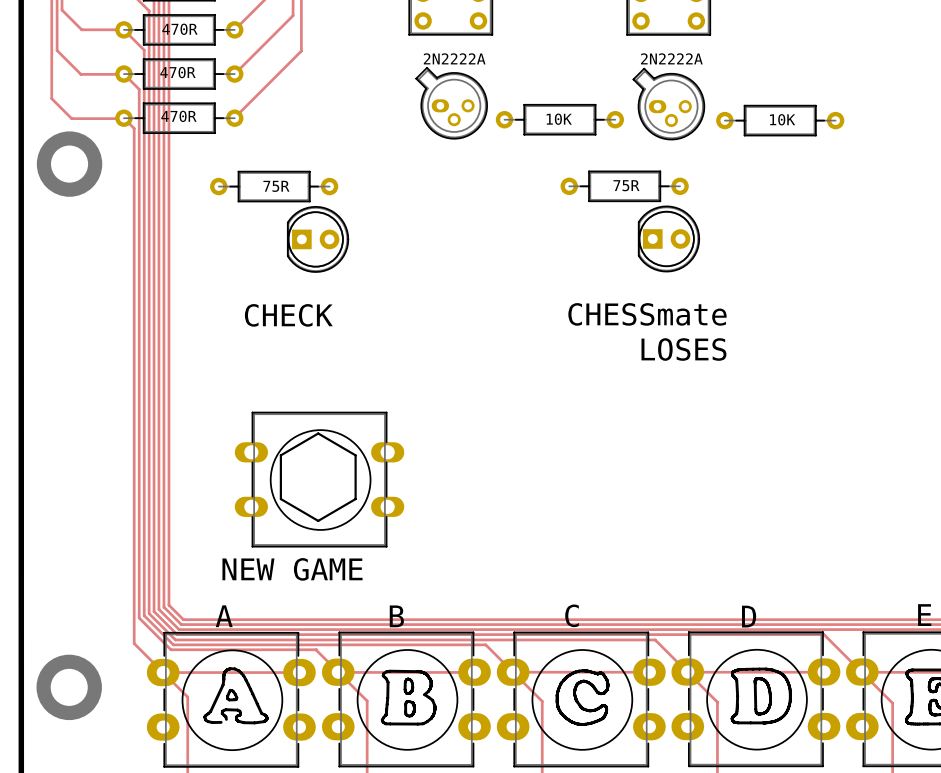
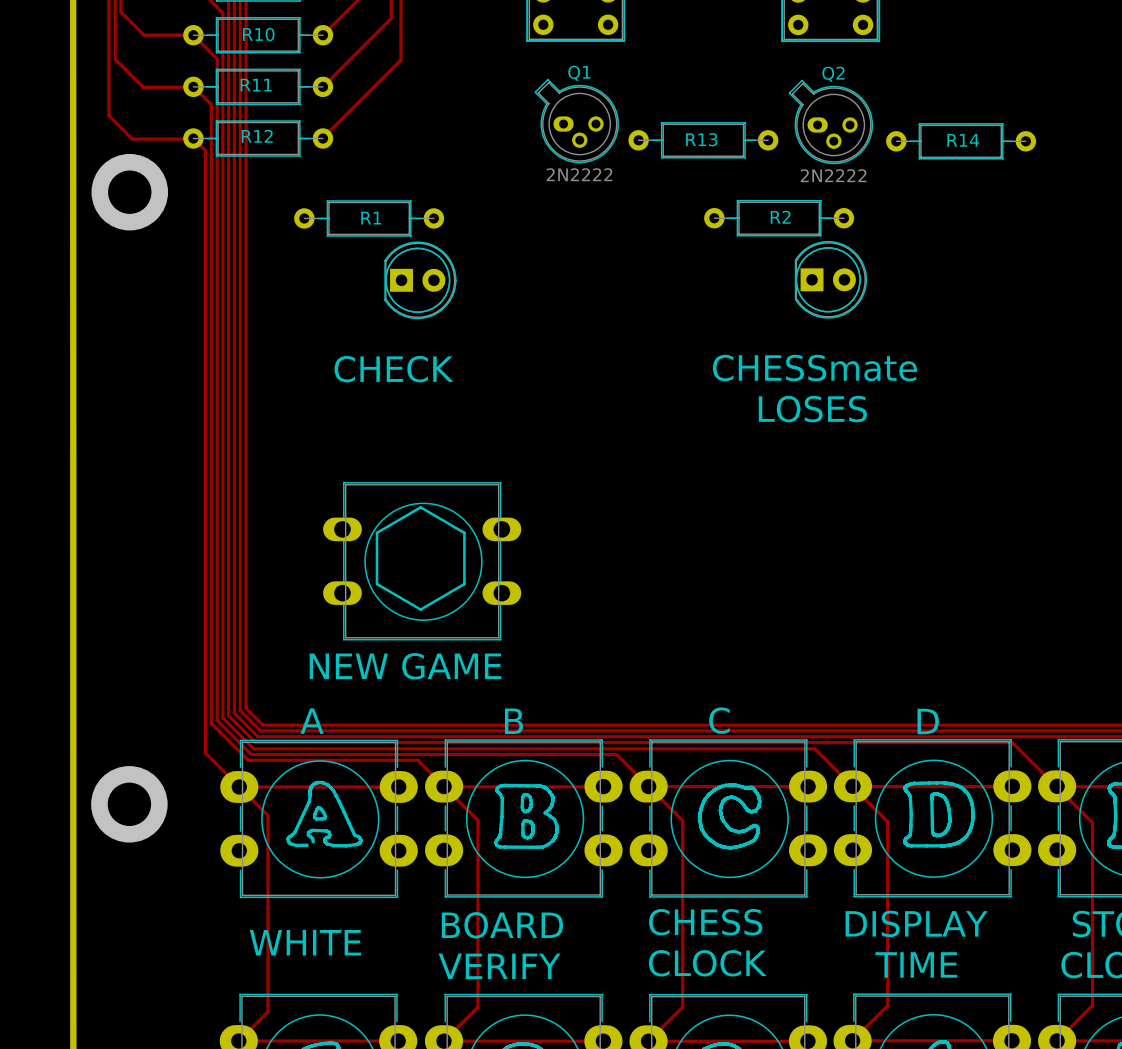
470R name: 470R (179, 29) -> R10 (258, 34)
2N2222A name: 2N2222A (454, 58) -> Q1 (579, 73)
2N2222A name: 2N2222A (671, 58) -> Q2 (833, 74)
470R name: 470R (177, 72) -> R11 (256, 85)
470R name: 470R (178, 116) -> R12 (257, 136)
10K name: 10K (559, 119) -> R13 (701, 139)
10K name: 10K (782, 119) -> R14 (963, 140)
2N2222A value: none -> 2N2222 (579, 174)
2N2222A value: none -> 2N2222 (833, 175)
75R name: 75R (626, 185) -> R2 (780, 217)
75R name: 75R (276, 186) -> R1 (371, 218)

